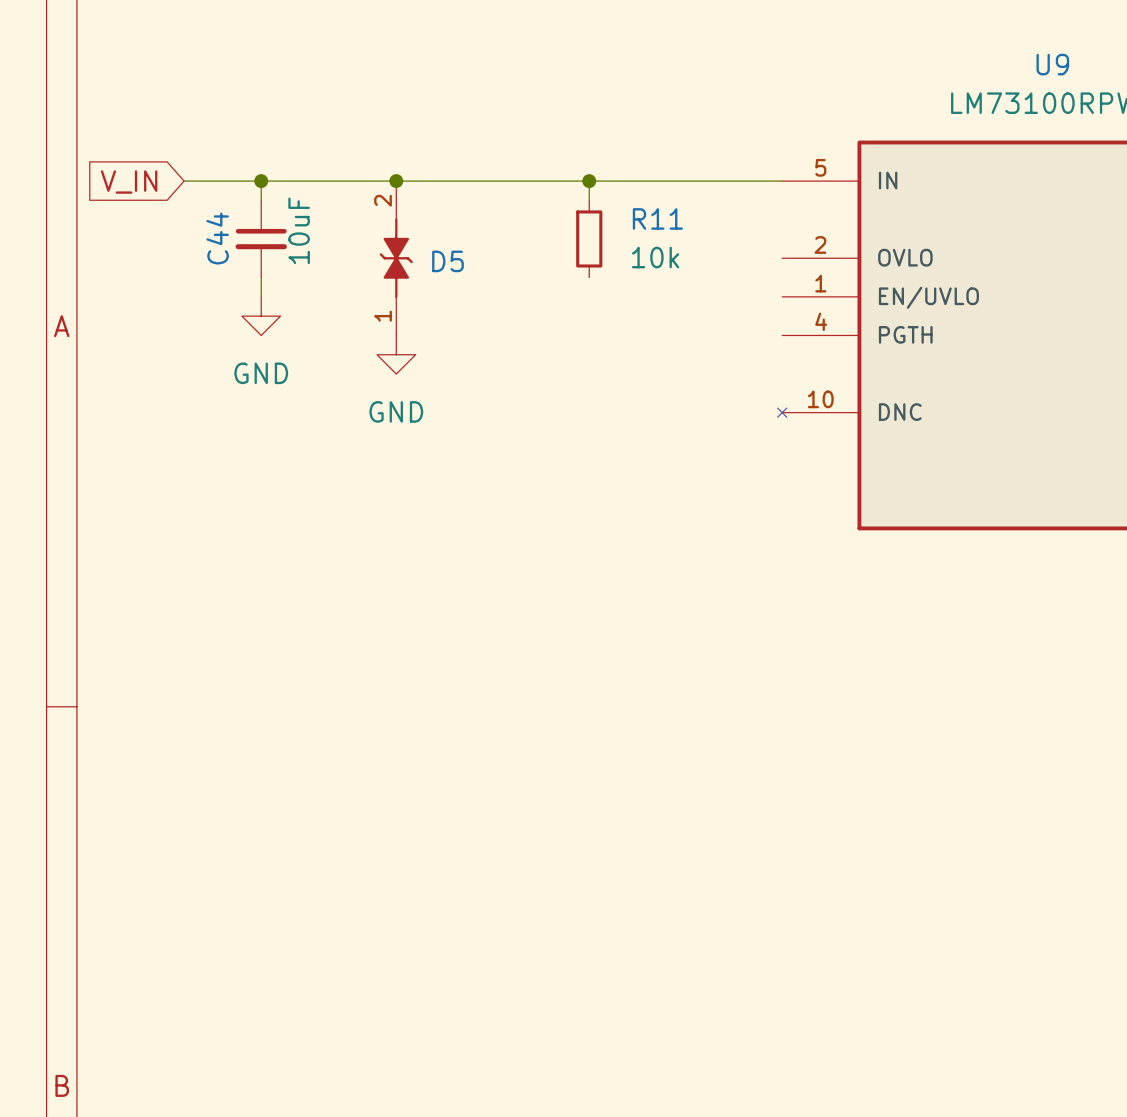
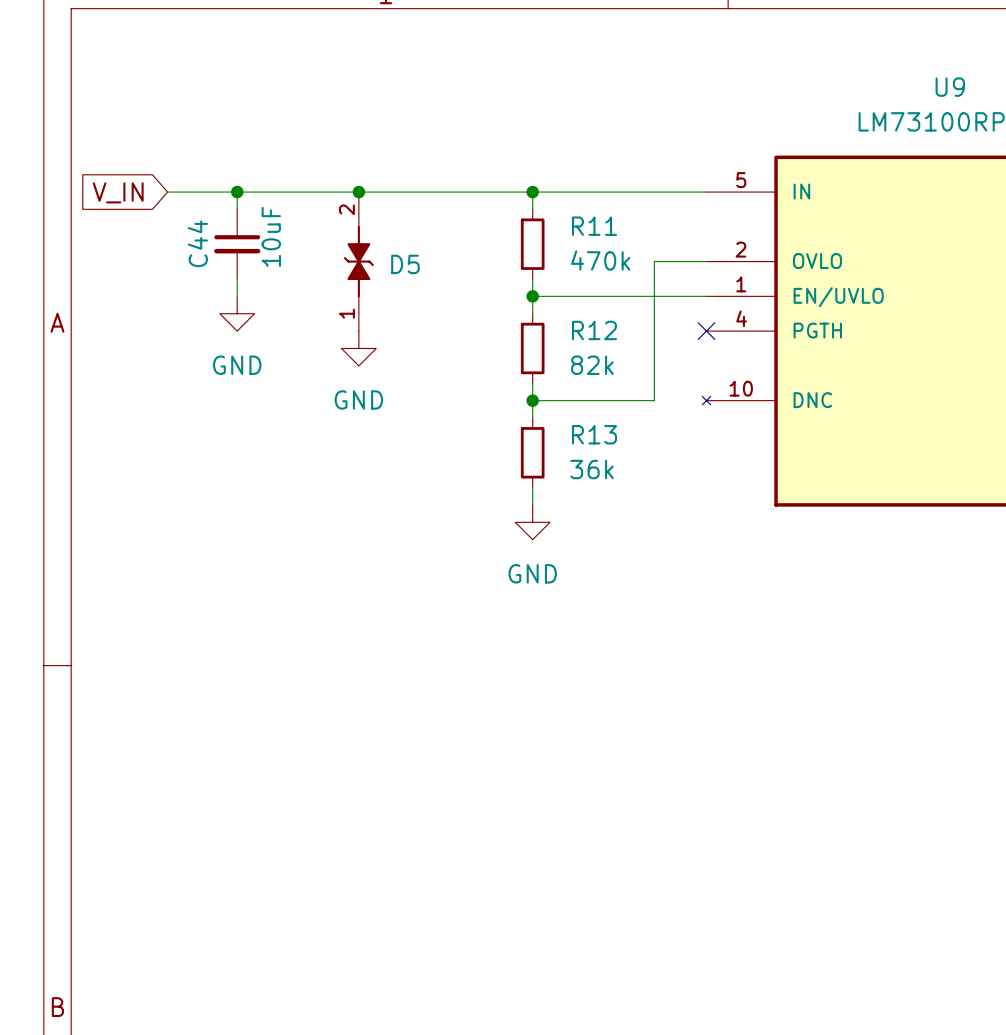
R11 value: 10k (655, 257) -> 470k (600, 260)
wire: none -> (706, 261) (654, 261) (654, 400) (532, 400)
wire: none -> (532, 278) (532, 313)
wire: none -> (532, 296) (706, 296)
junction: none -> (532, 296)
no-connect mark: none -> (706, 331)
R12: none -> 82k (532, 348)
wire: none -> (532, 383) (532, 418)
junction: none -> (532, 400)
R13: none -> 36k (532, 452)
wire: none -> (532, 487) (532, 504)
power symbol: none -> GND (532, 522)

